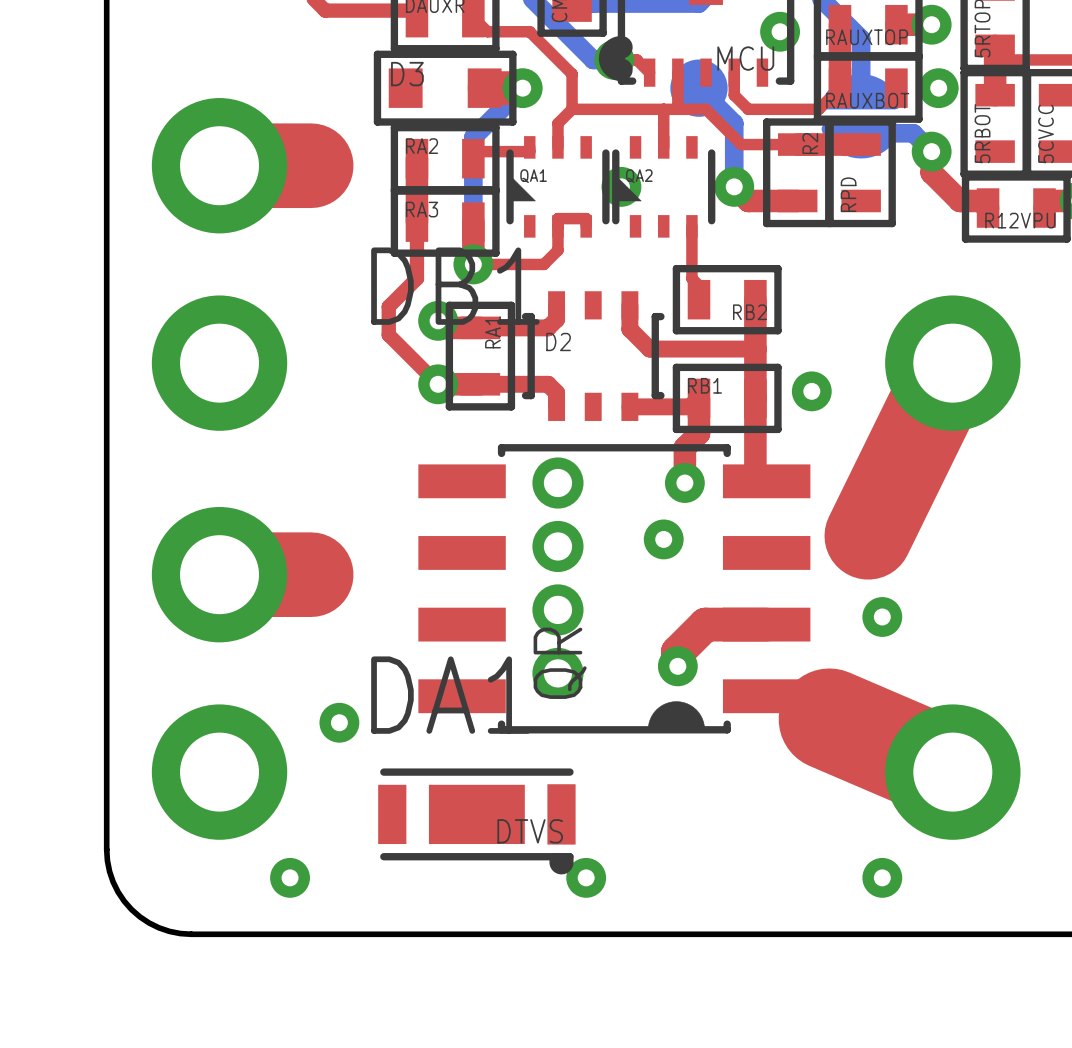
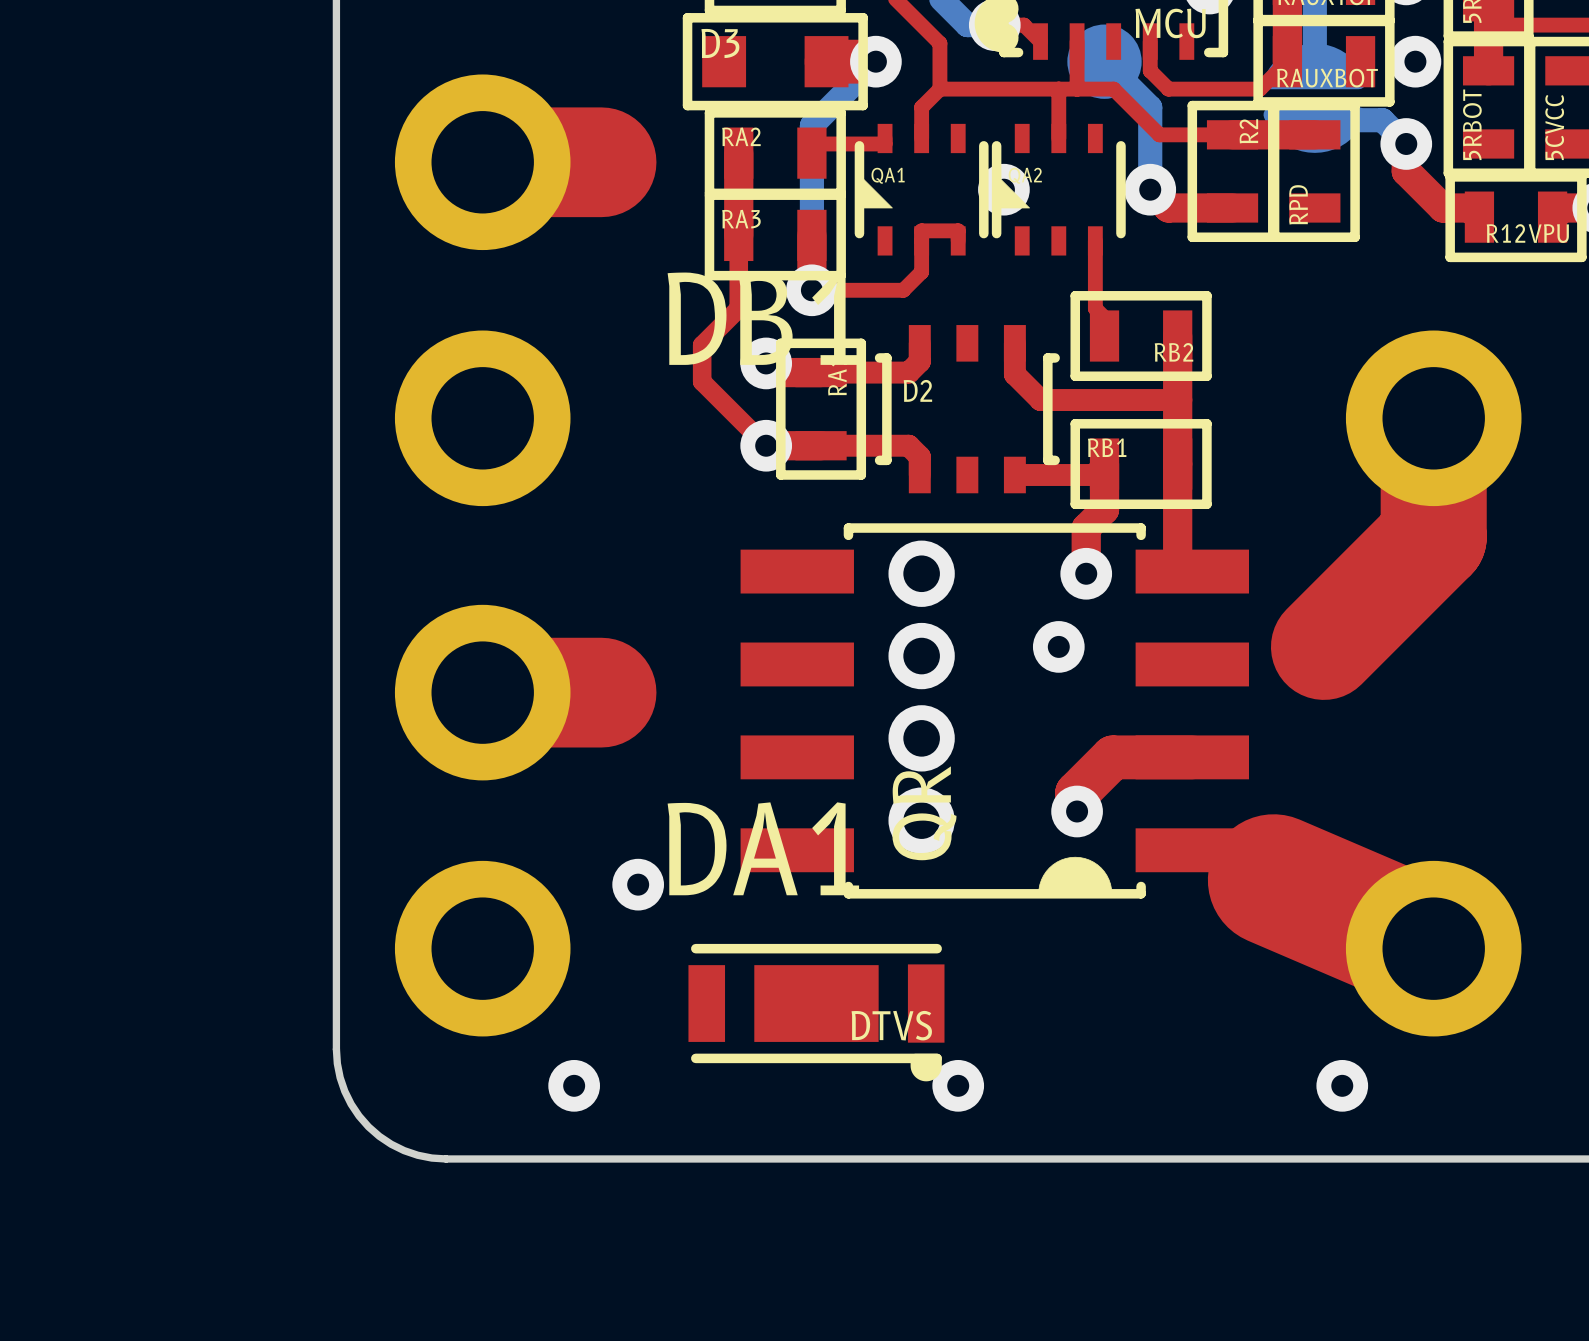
top track: (952, 363) (868, 535) -> (1433, 418) (1433, 537) (1323, 646)
via: (811, 391) -> none
via: (882, 616) -> none

